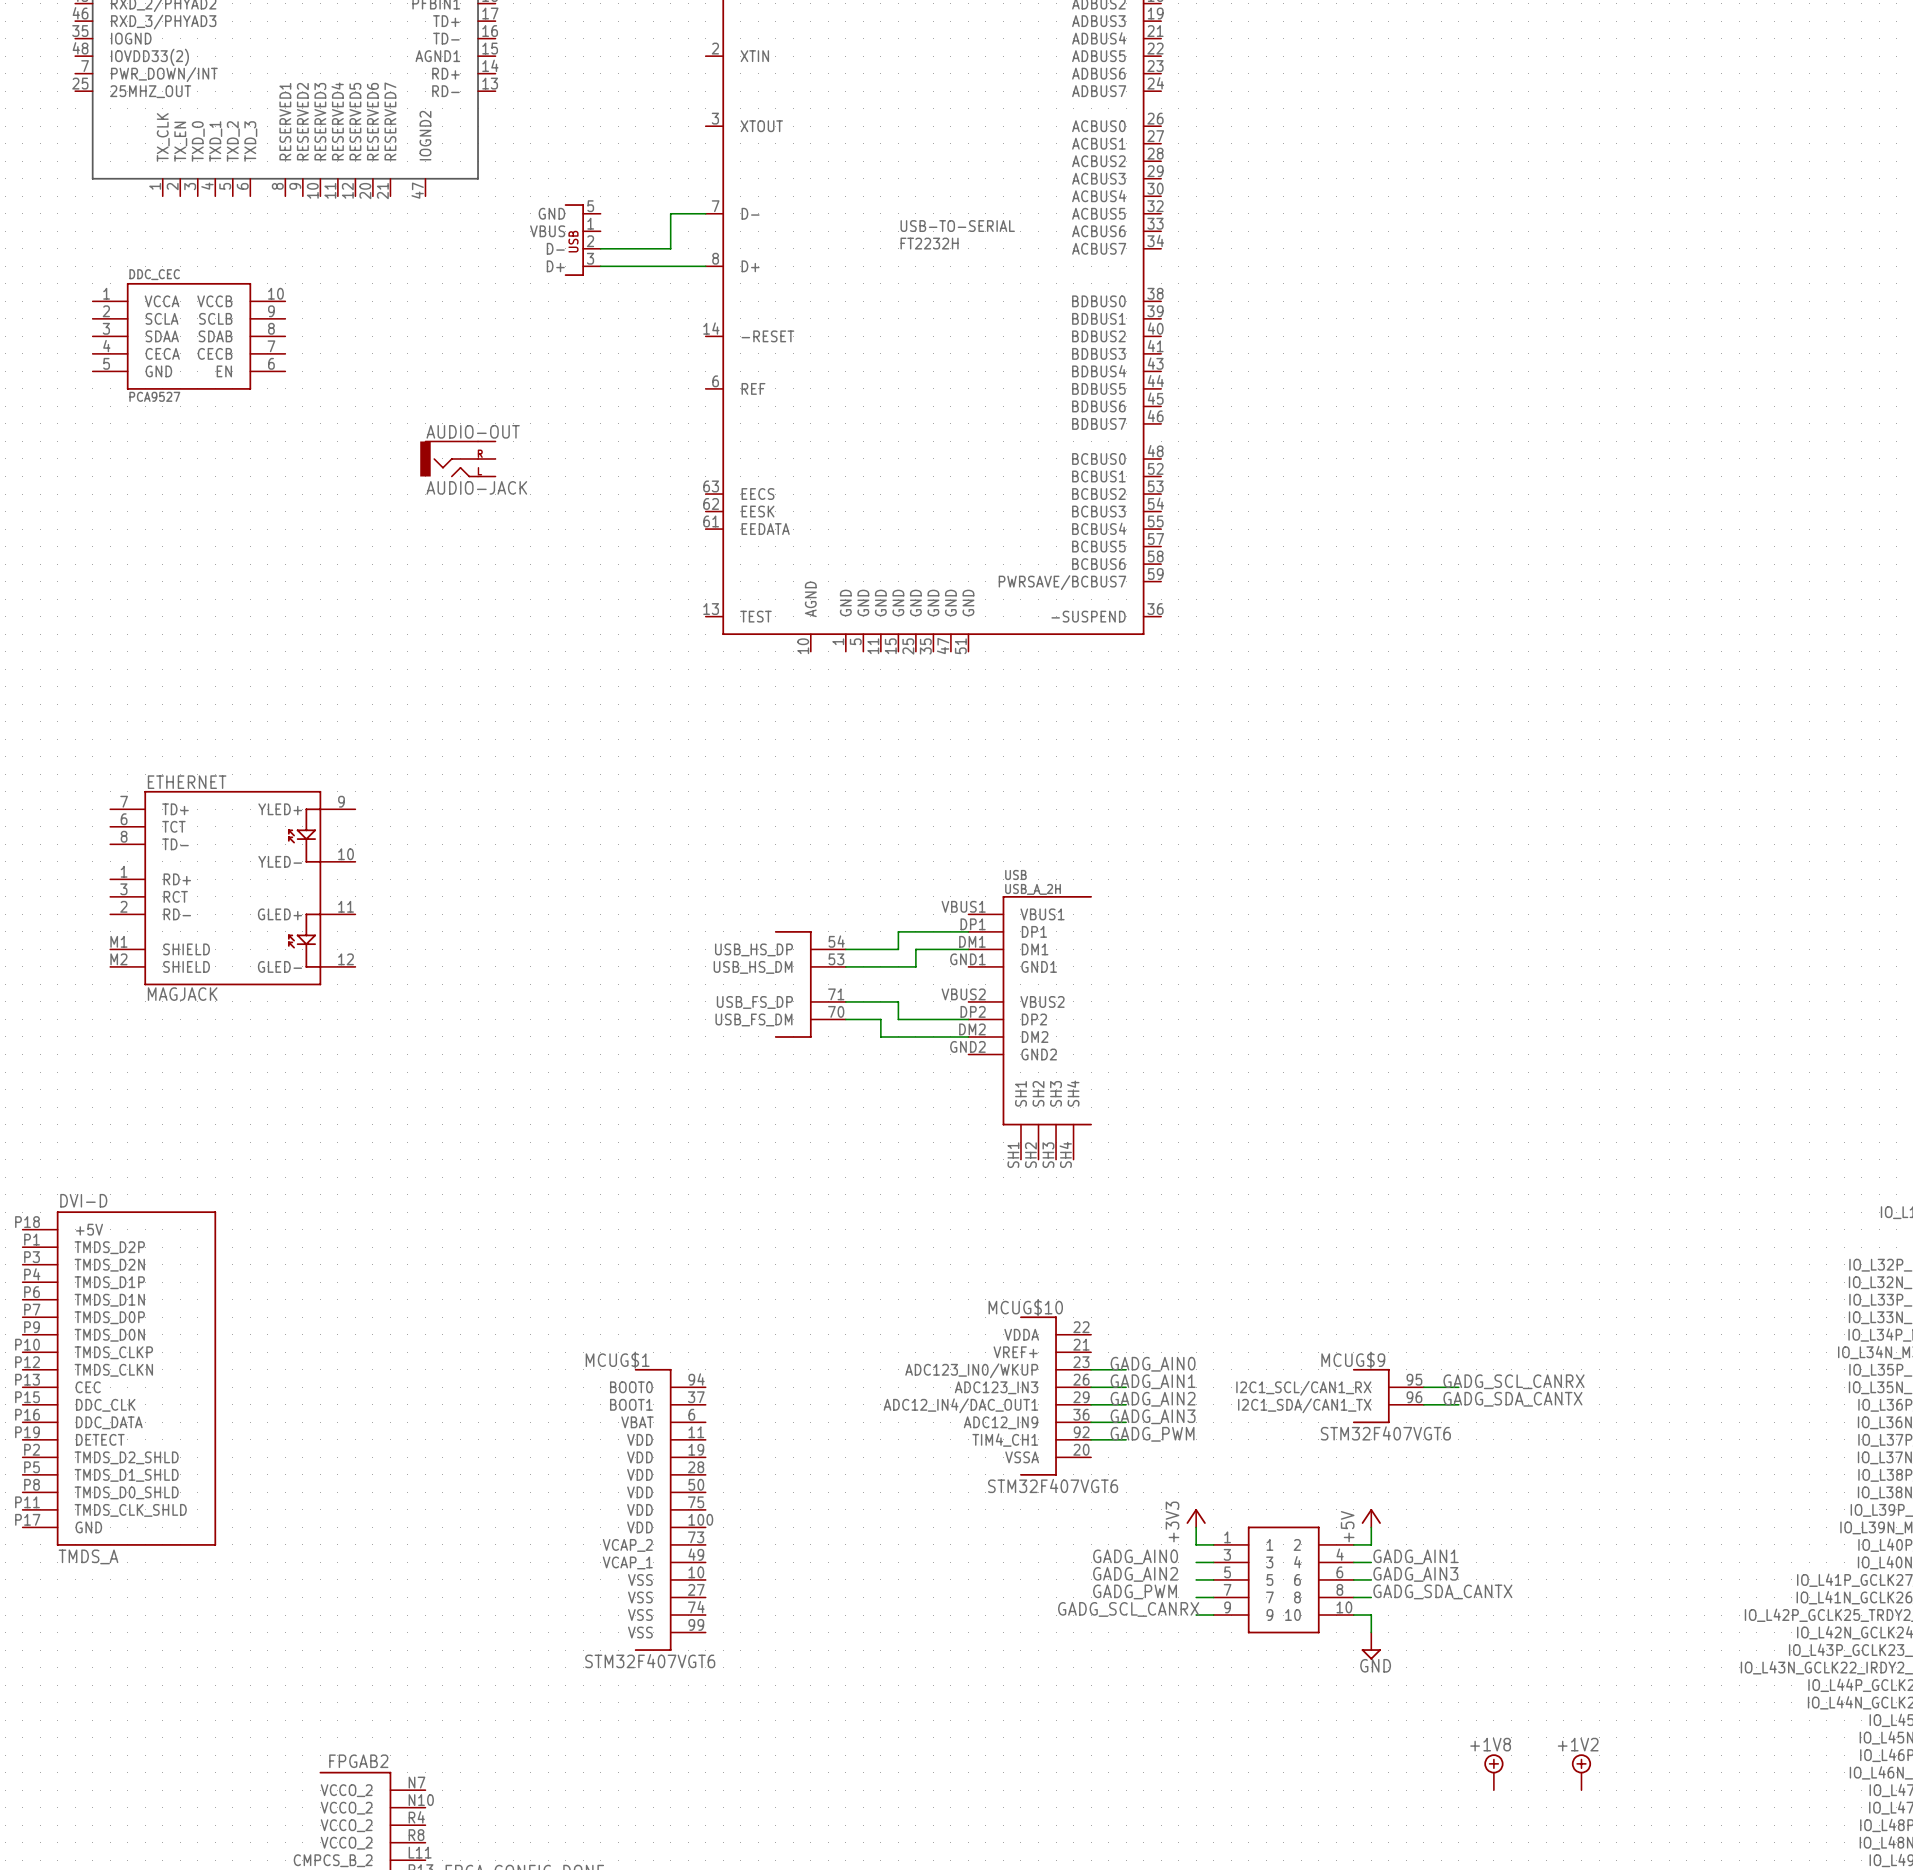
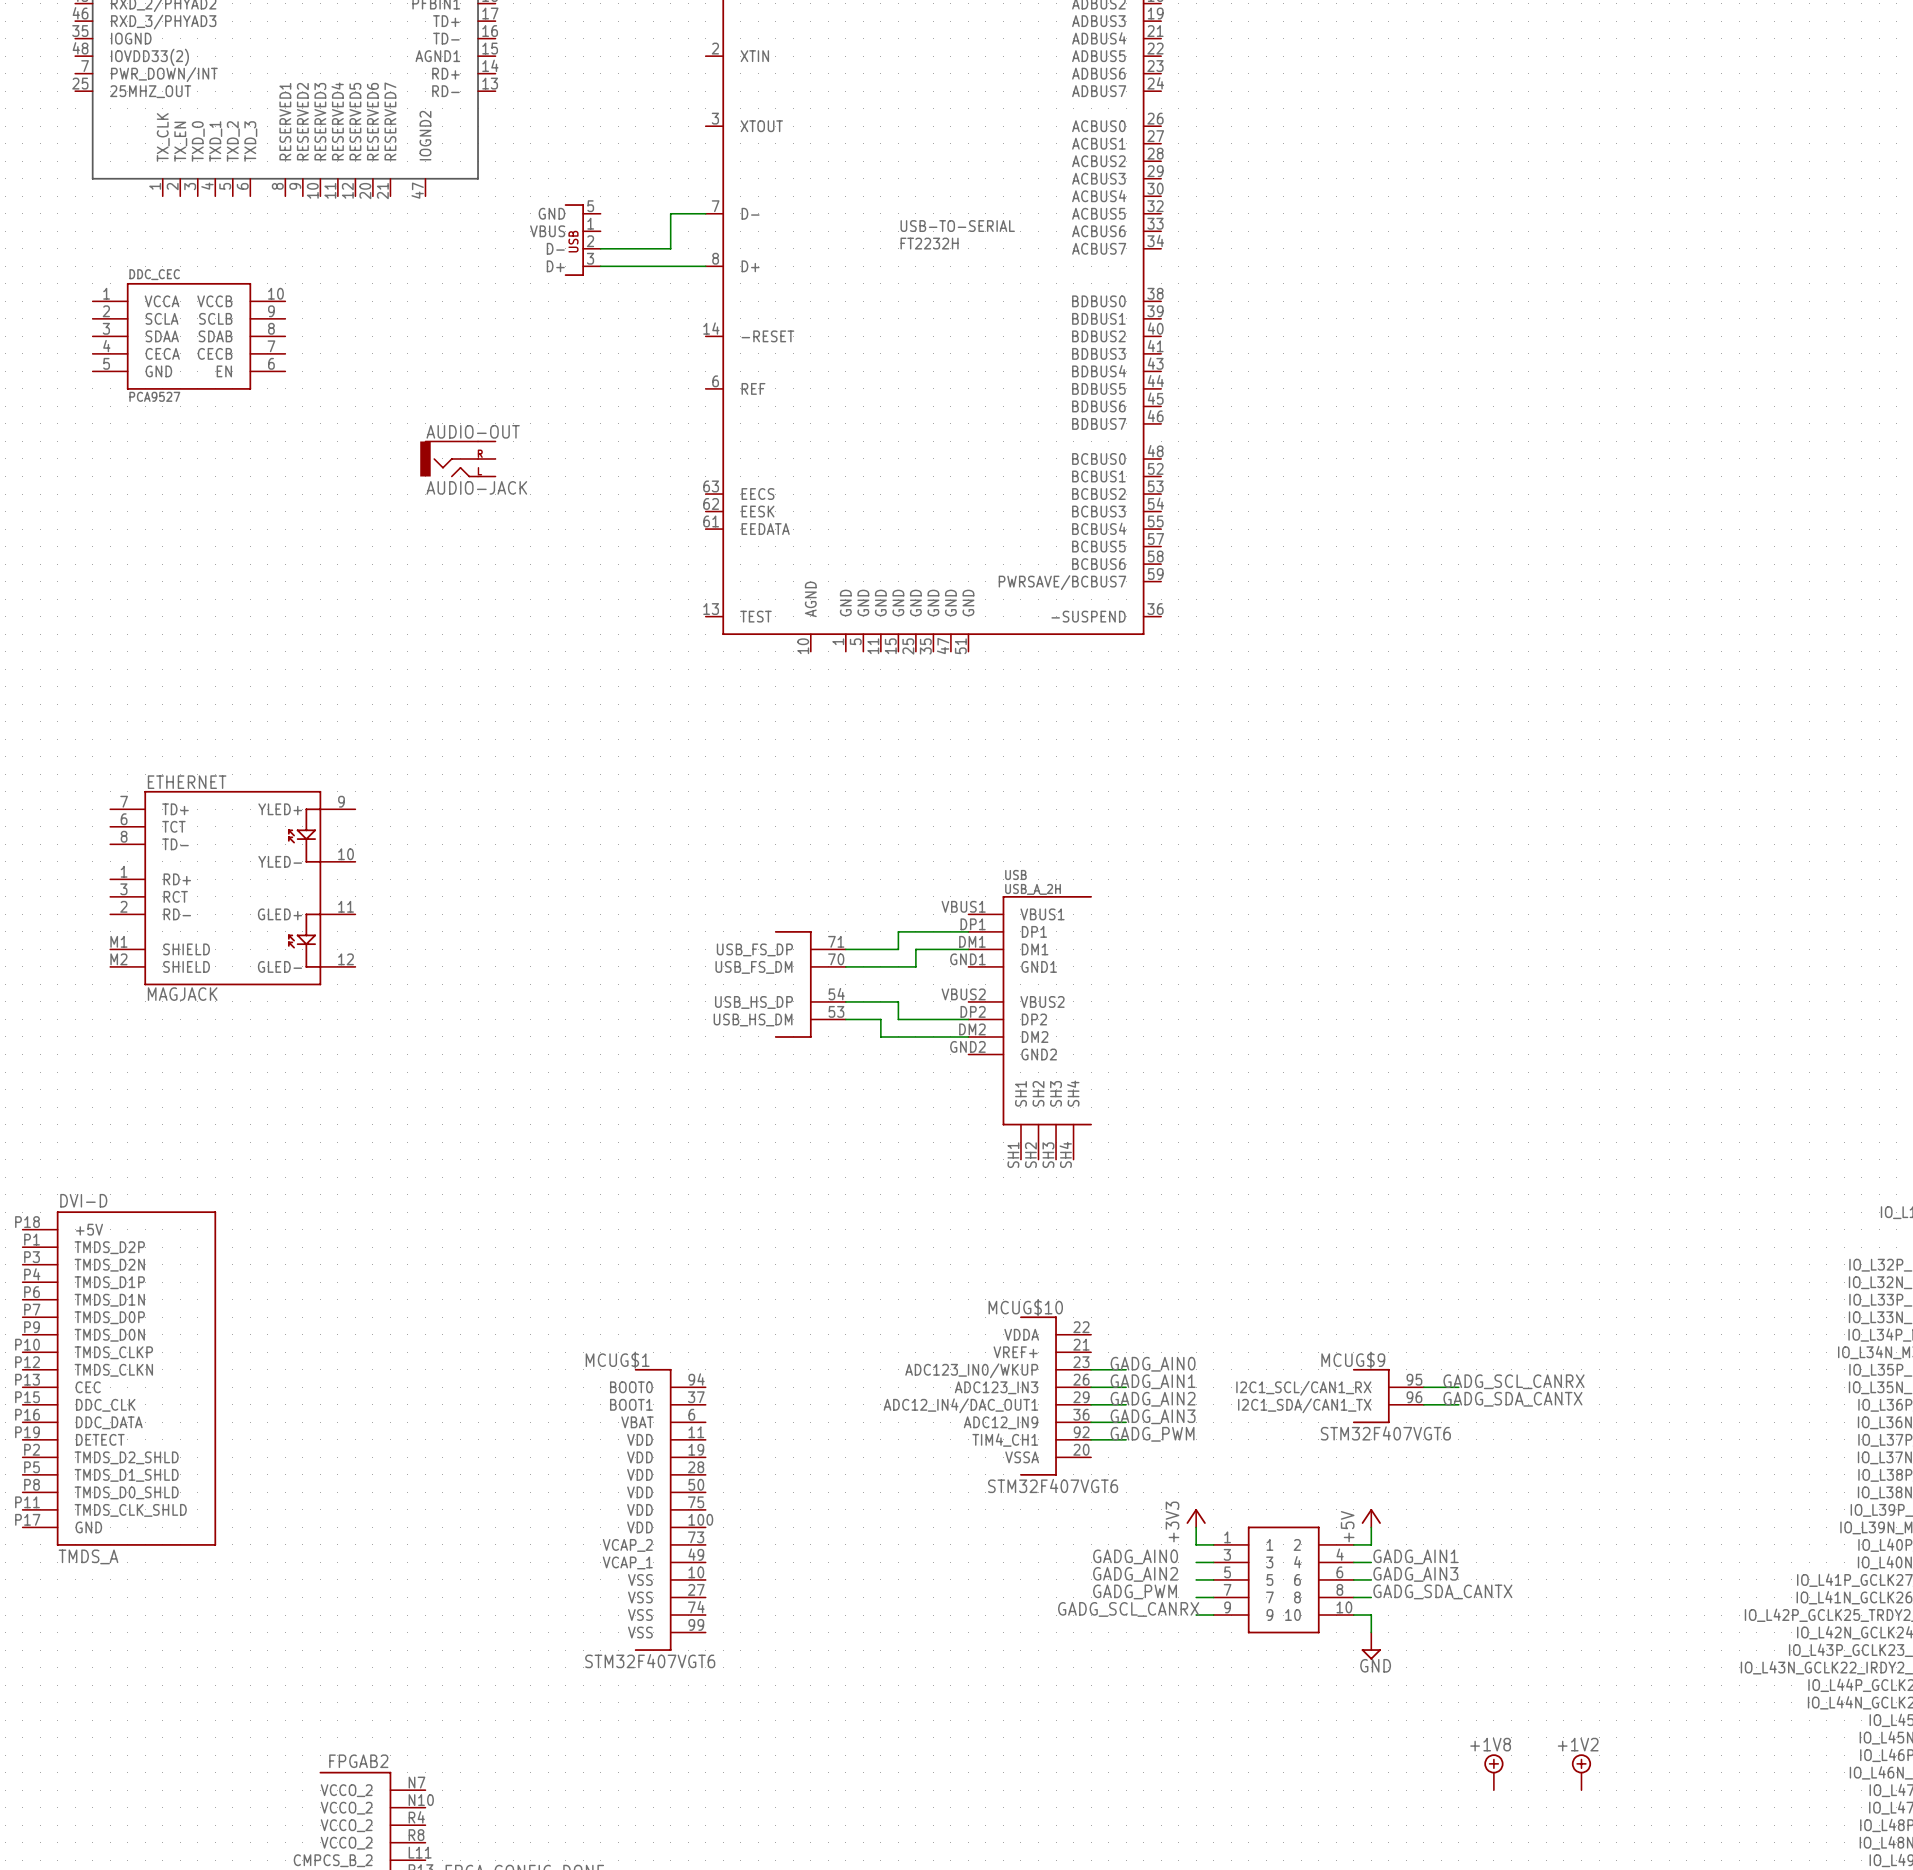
part pin number: 54 (836, 941) -> 71 (836, 941)
part pin name: USB_HS_DP (753, 949) -> USB_FS_DP (754, 949)
part pin number: 53 (836, 959) -> 70 (836, 959)
part pin name: USB_HS_DM (753, 967) -> USB_FS_DM (753, 967)
part pin number: 71 (836, 994) -> 54 (836, 994)
part pin name: USB_FS_DP (754, 1002) -> USB_HS_DP (753, 1002)
part pin number: 70 (836, 1011) -> 53 (836, 1011)
part pin name: USB_FS_DM (753, 1019) -> USB_HS_DM (753, 1019)

